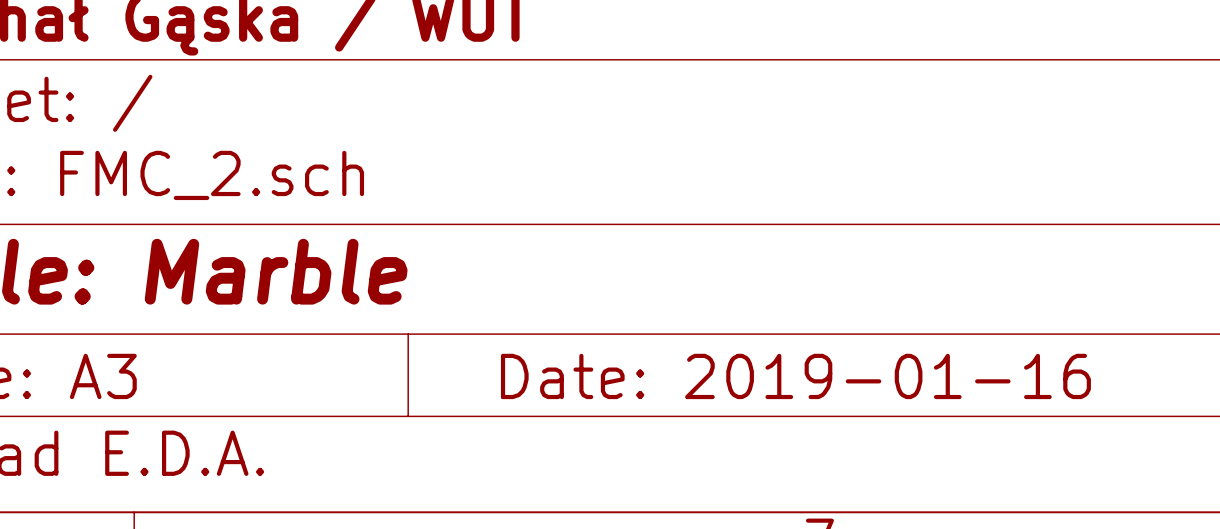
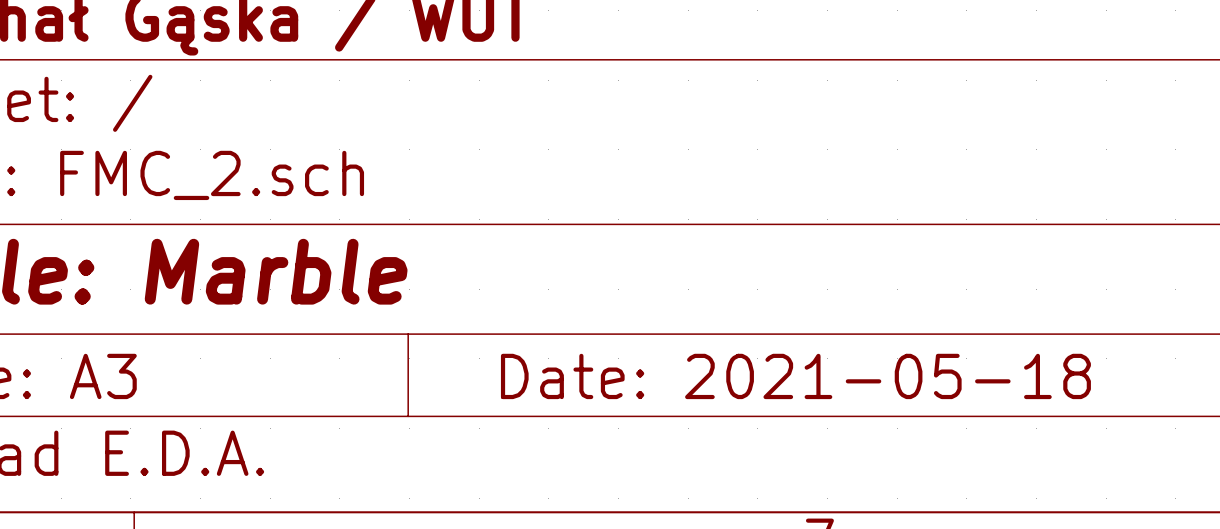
title block: Date: 2019-01-16 (795, 376) -> Date: 2021-05-18 (795, 376)

